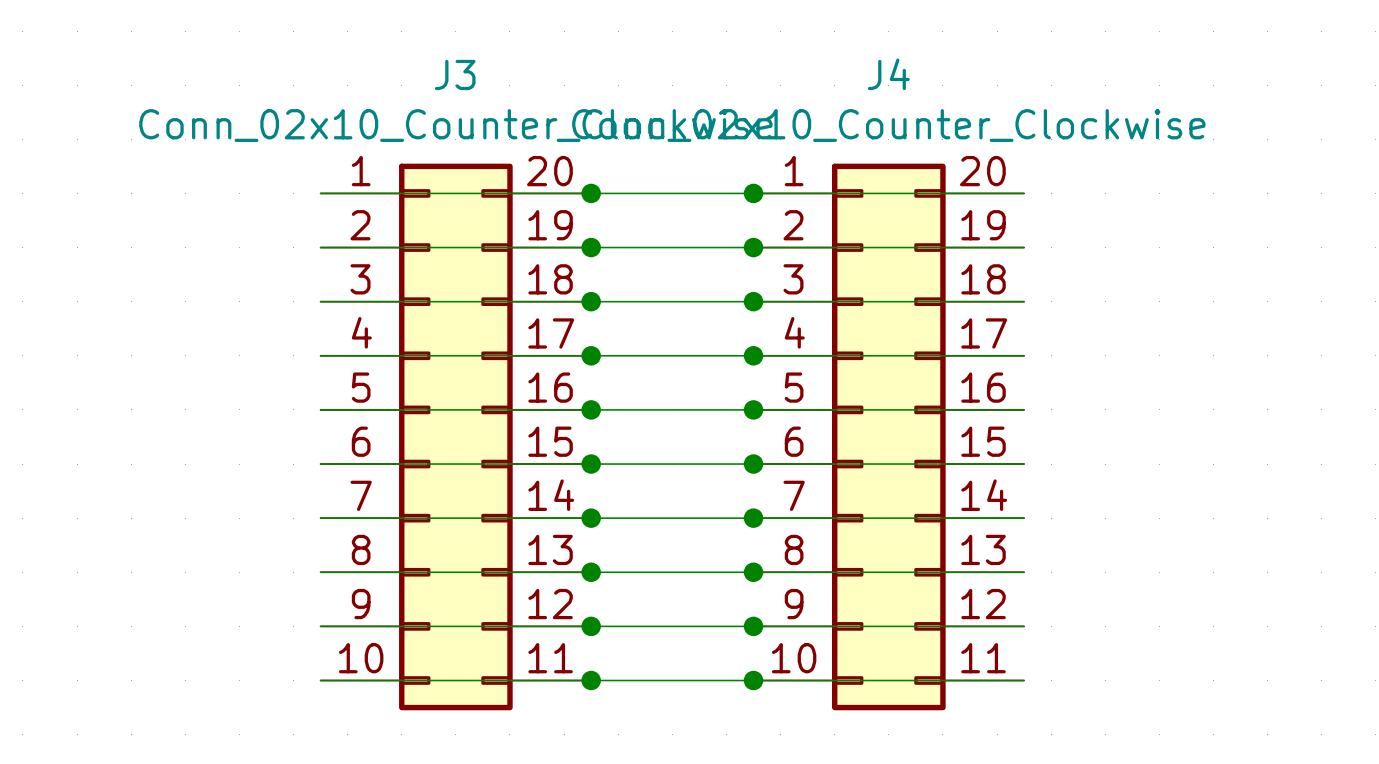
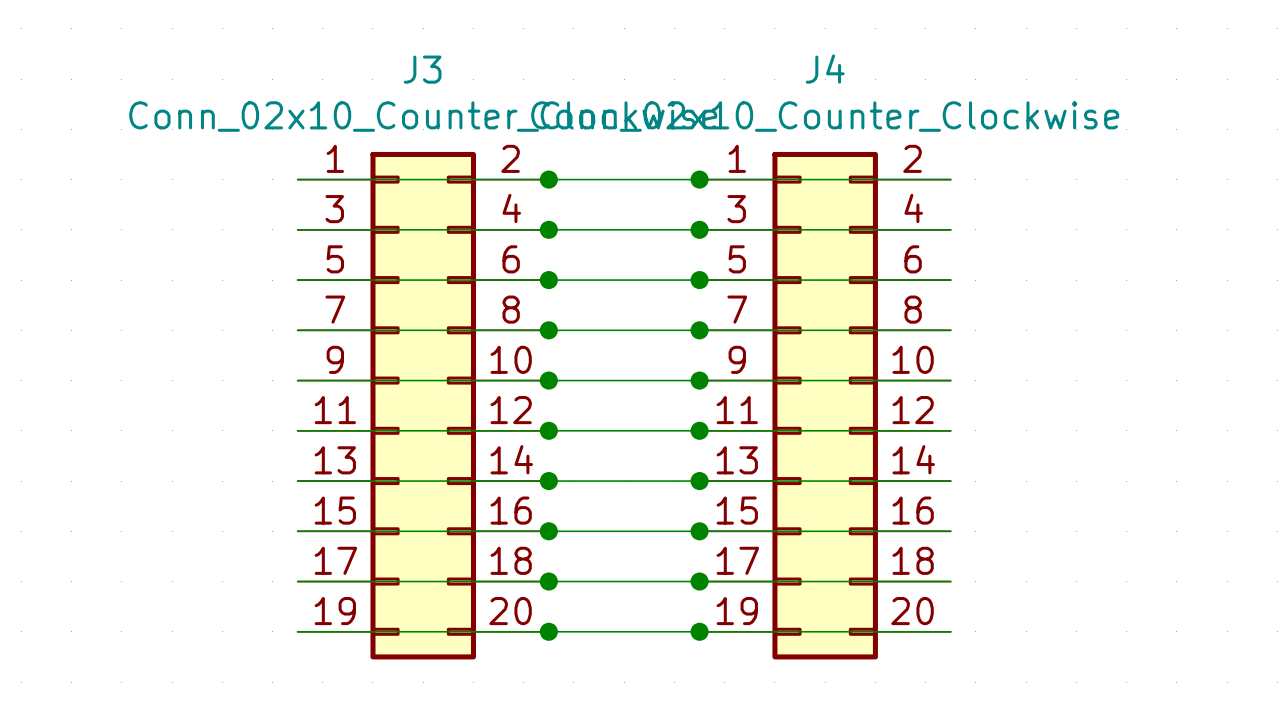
J3 symbol: [320, 163, 592, 711] -> [297, 151, 549, 660]
J4 symbol: [753, 163, 1025, 711] -> [699, 151, 951, 660]

